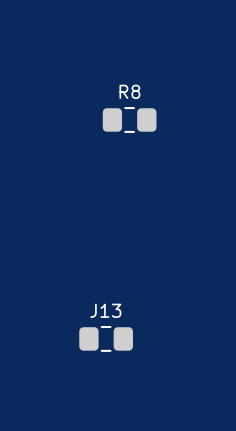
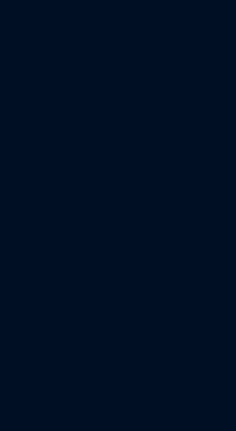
R8: (129, 119) -> none
J13: (106, 338) -> none

